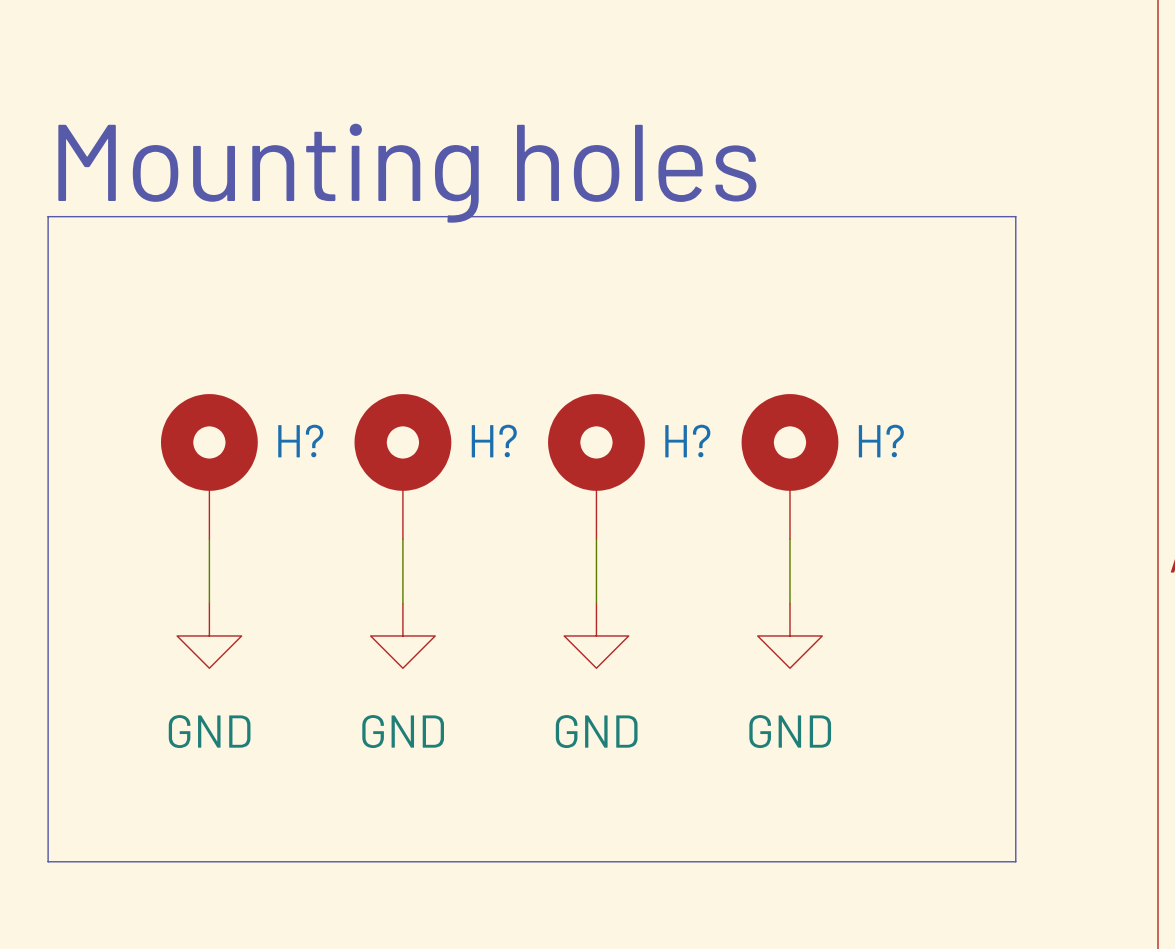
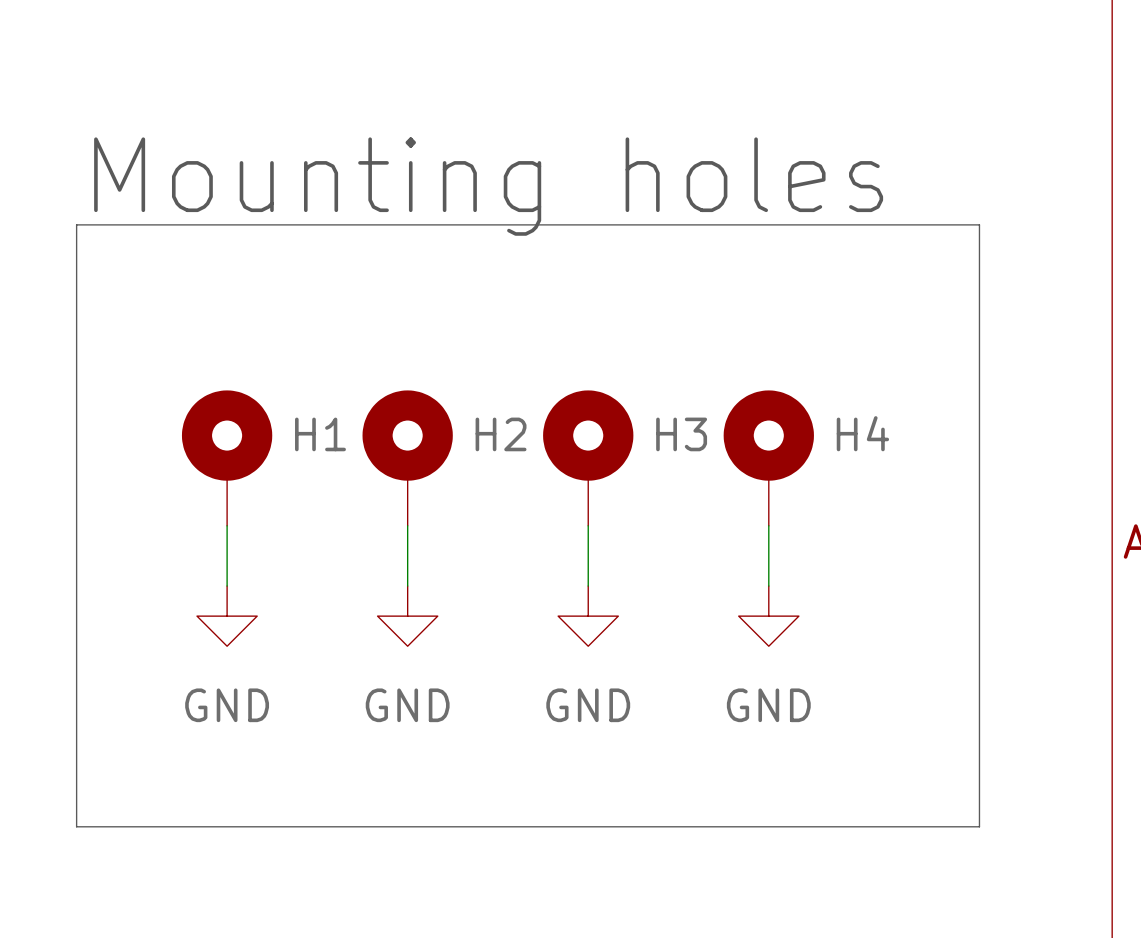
H? name: H? (300, 441) -> H1 (320, 434)
H? name: H? (494, 441) -> H2 (501, 434)
H? name: H? (687, 441) -> H3 (681, 434)
H? name: H? (881, 441) -> H4 (862, 433)

